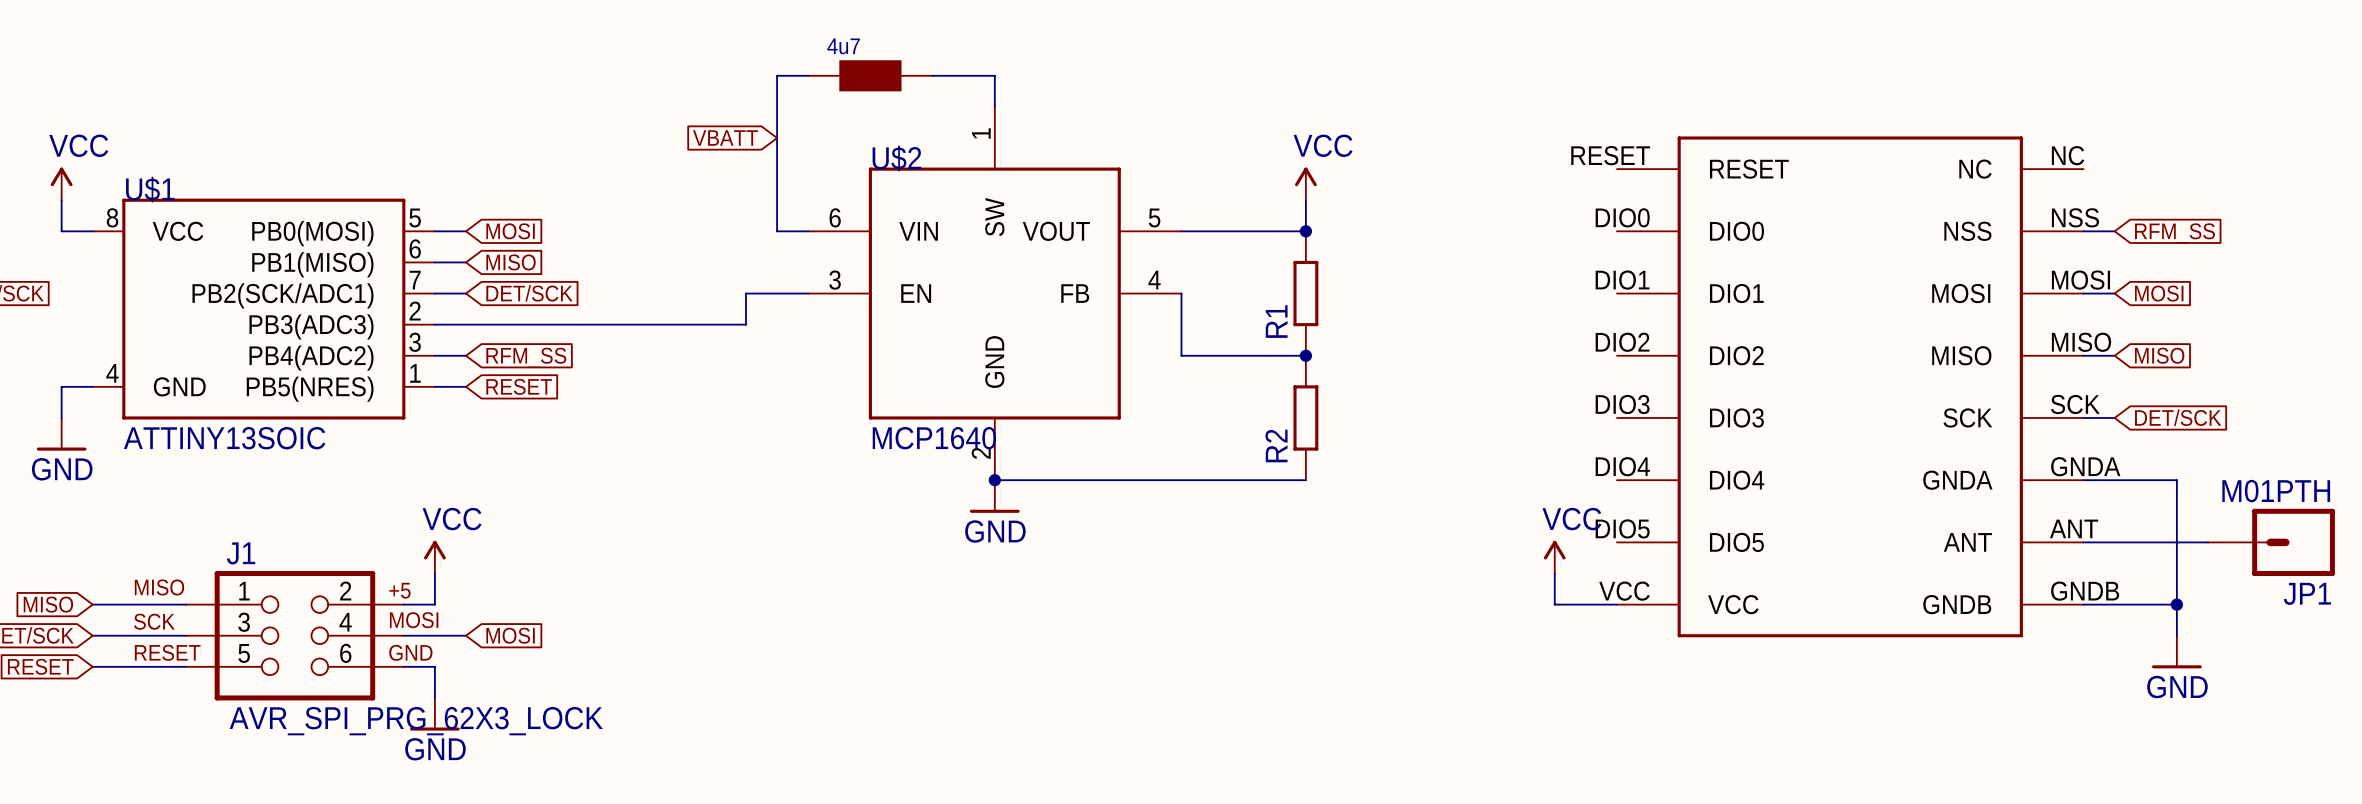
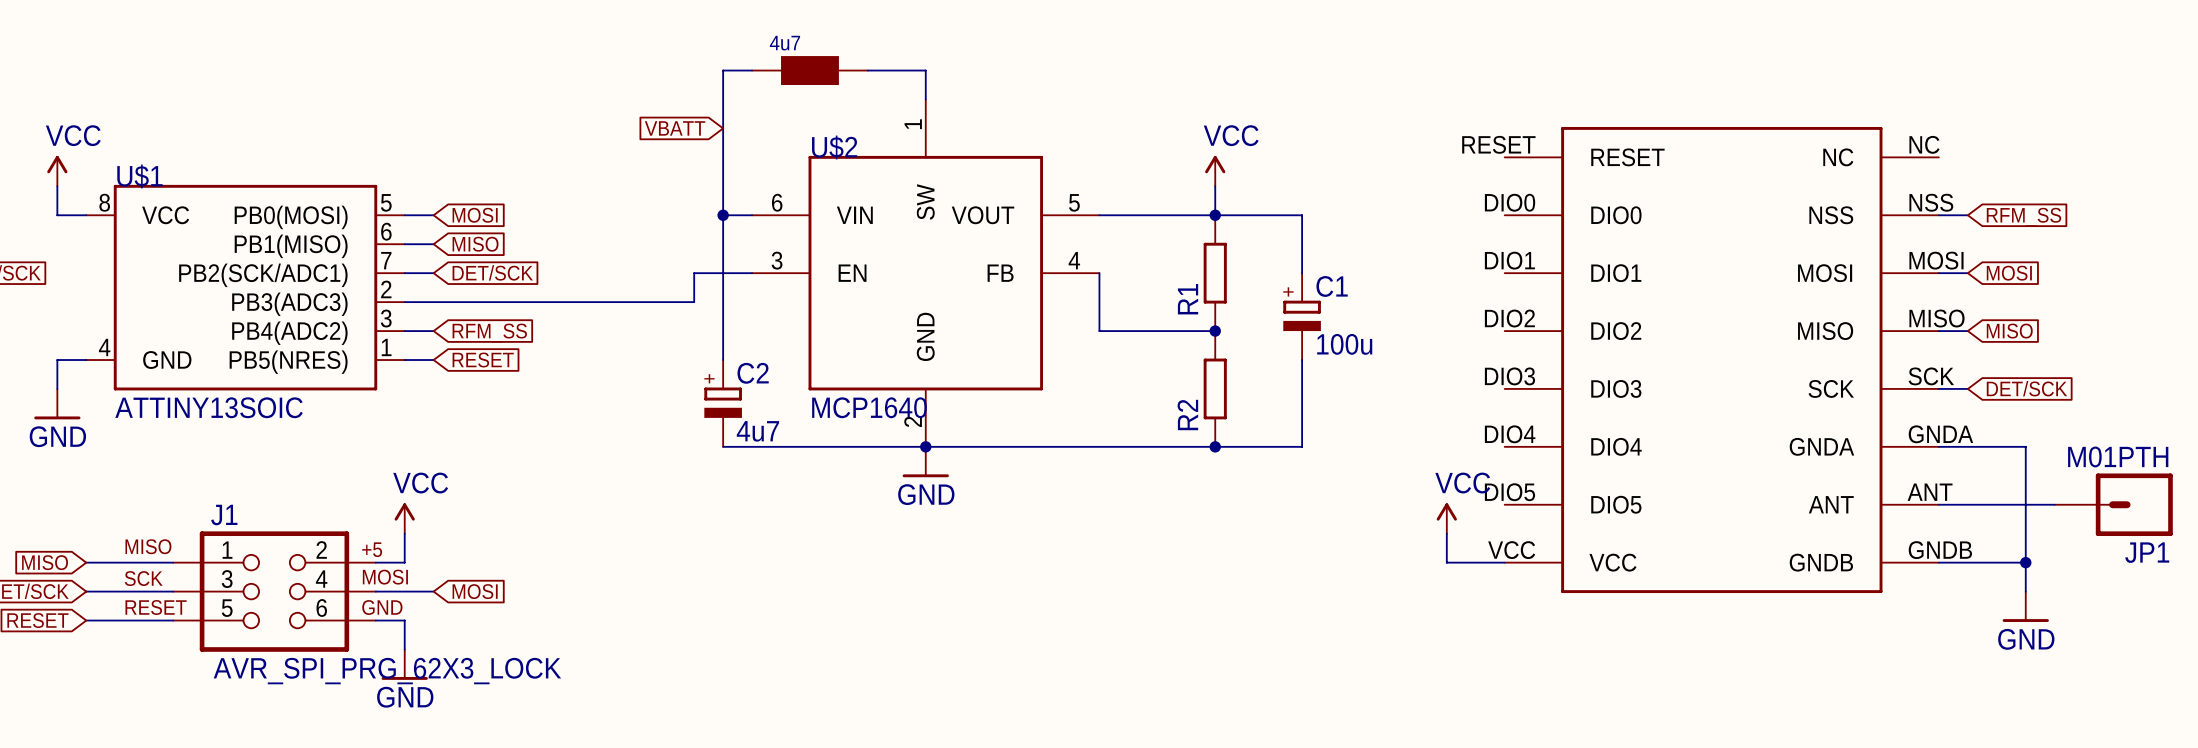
wire: none -> (723, 215) (723, 360)
junction: none -> (723, 215)
wire: none -> (1215, 215) (1302, 215) (1302, 273)
C1: none -> 100u (1302, 316)
wire: none -> (1302, 360) (1302, 446) (1215, 446)
C2: none -> 4u7 (723, 403)
wire: none -> (723, 446) (925, 446)
junction: none -> (1215, 446)

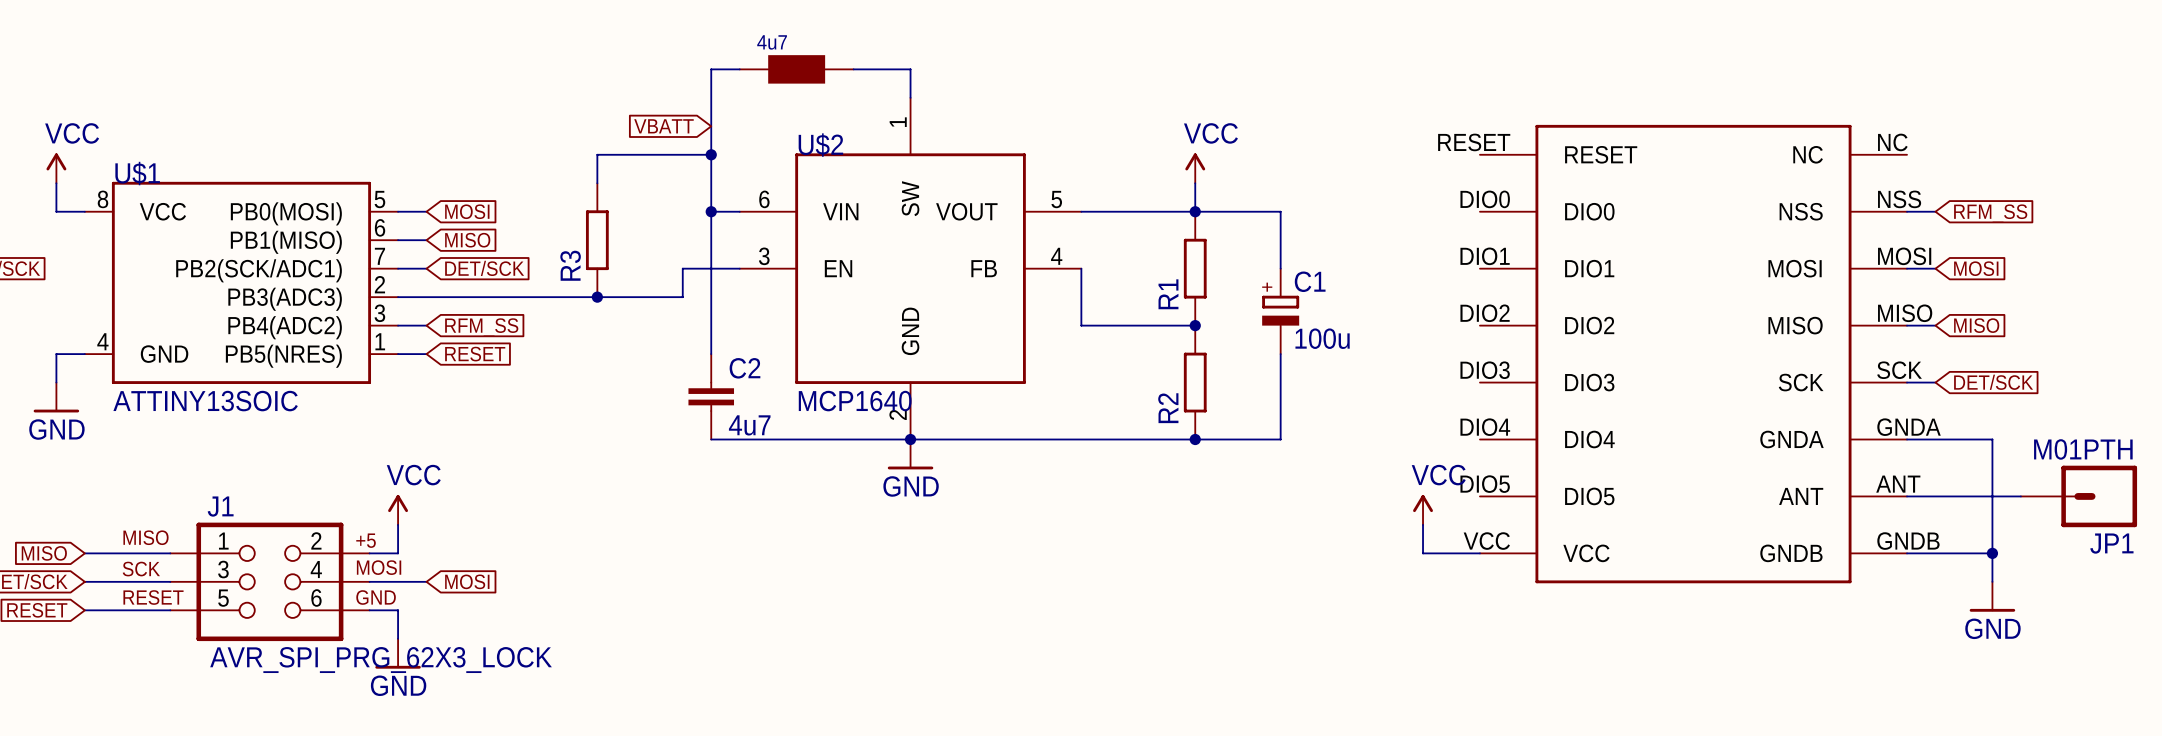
wire: none -> (711, 154) (597, 154) (597, 183)
junction: none -> (711, 154)
R3: none -> (597, 240)
junction: none -> (597, 297)
C2 symbol: [704, 360, 742, 447] -> [688, 354, 735, 440]

